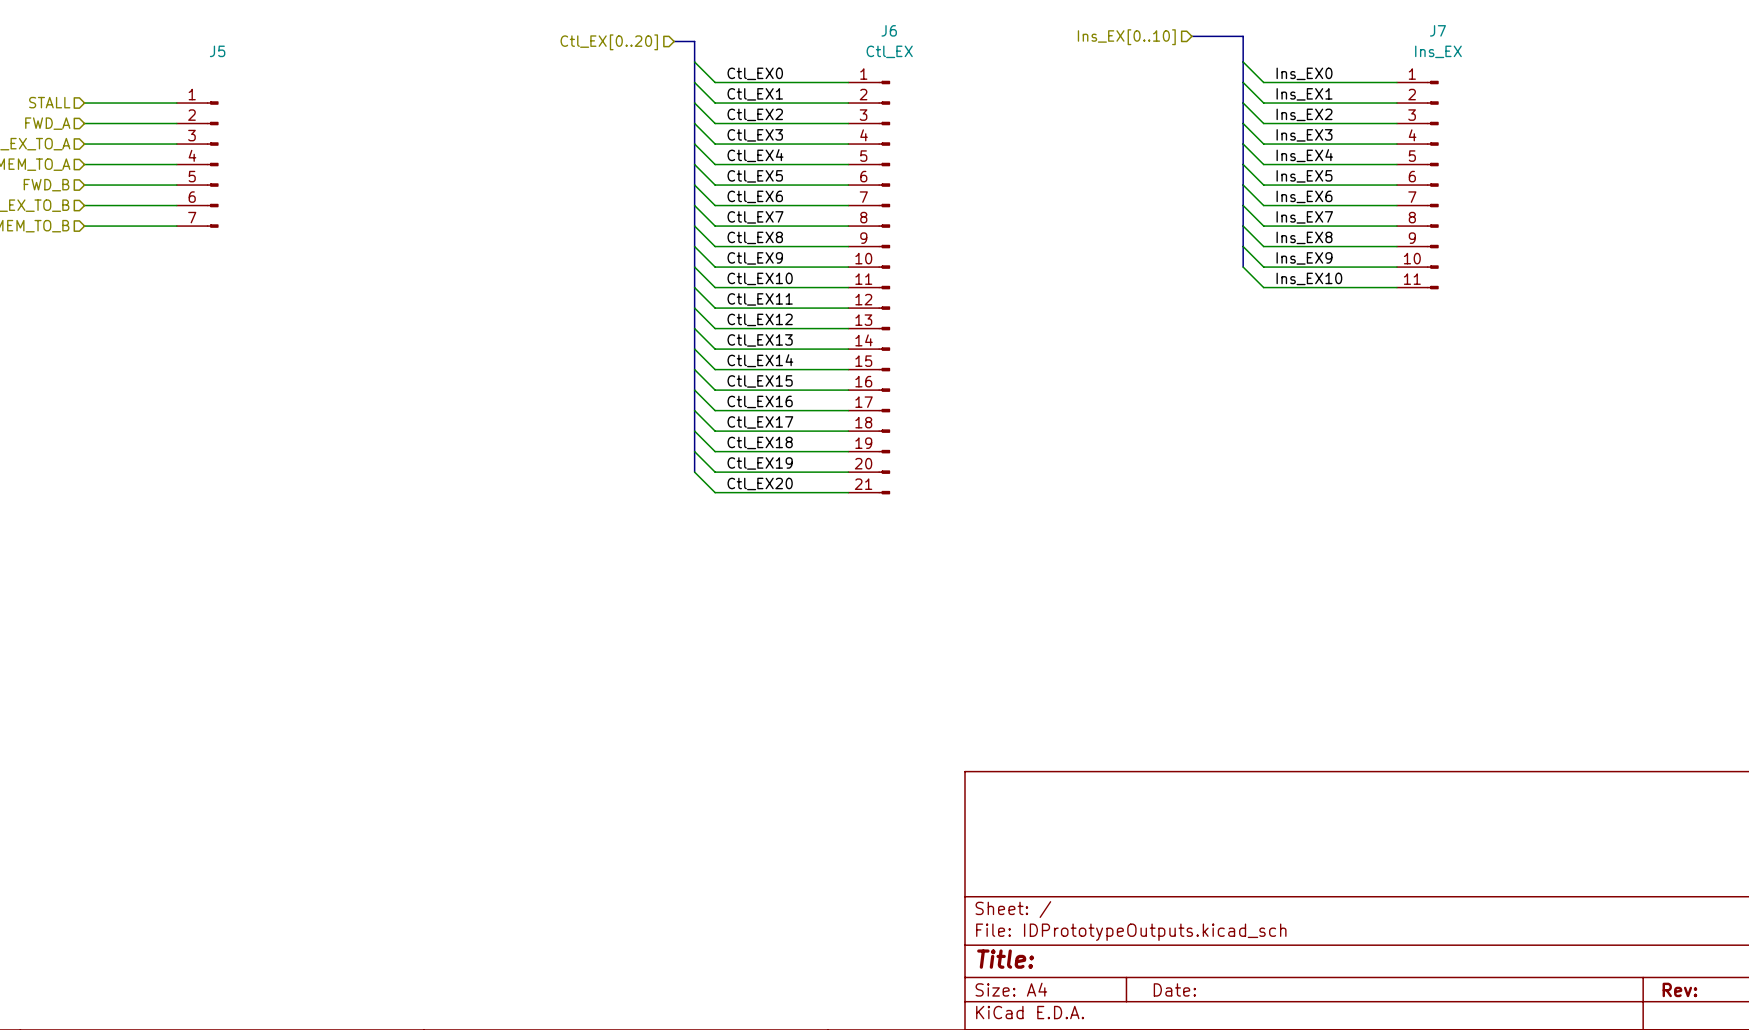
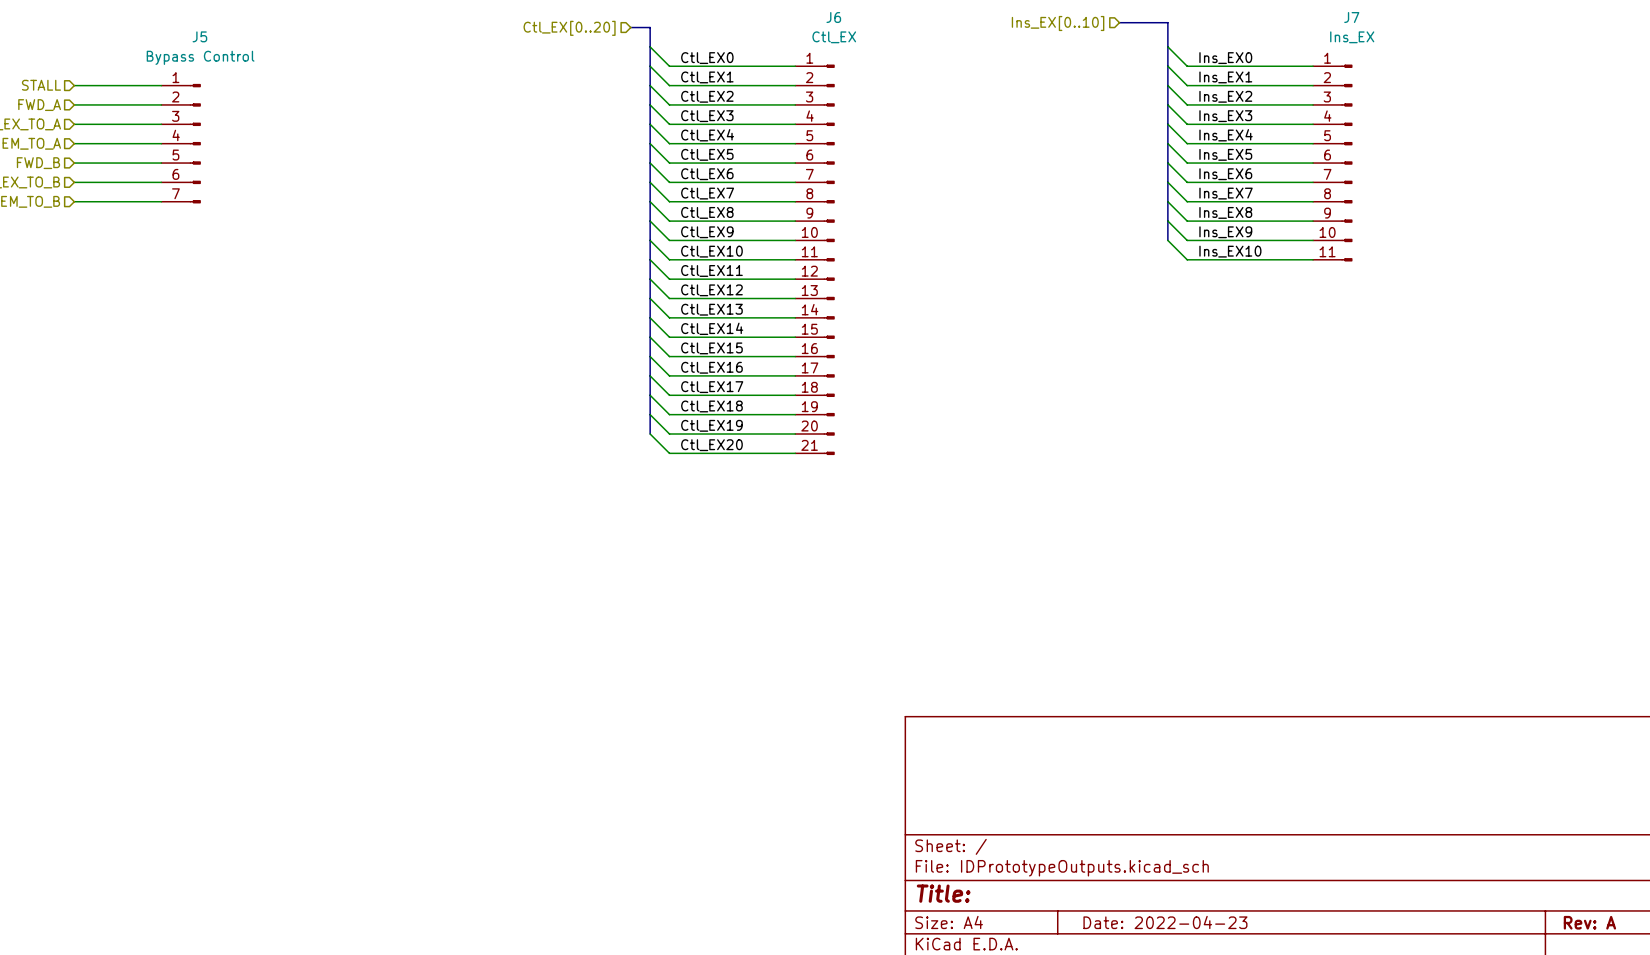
J5 value: none -> Bypass Control (200, 57)
title block: Date: (1174, 989) -> Date: 2022-04-23 (1165, 922)
title block: Rev: (1679, 989) -> Rev: A (1589, 922)

